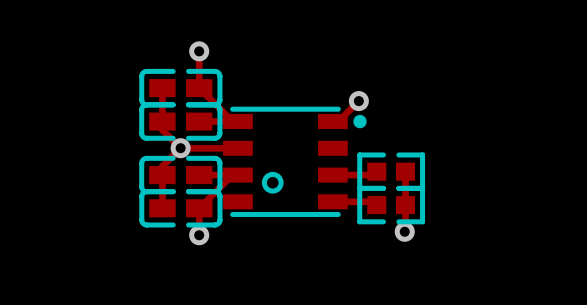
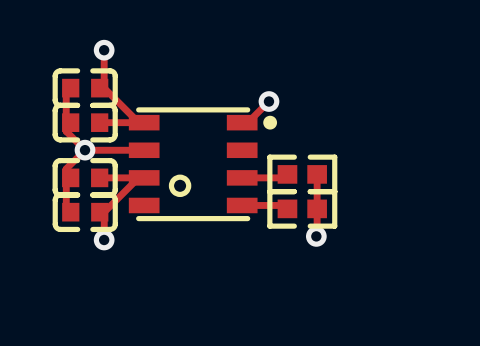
part footprint: [139, 68, 223, 108] -> [52, 68, 118, 108]
part footprint: [139, 102, 223, 141] -> [52, 102, 118, 143]
part footprint: [139, 155, 223, 195] -> [52, 158, 118, 198]
part footprint: [139, 189, 223, 228] -> [52, 192, 118, 233]

